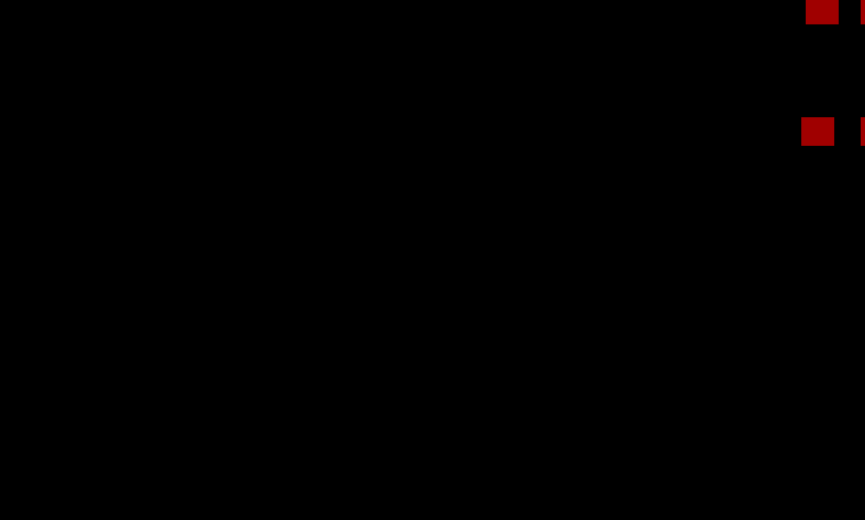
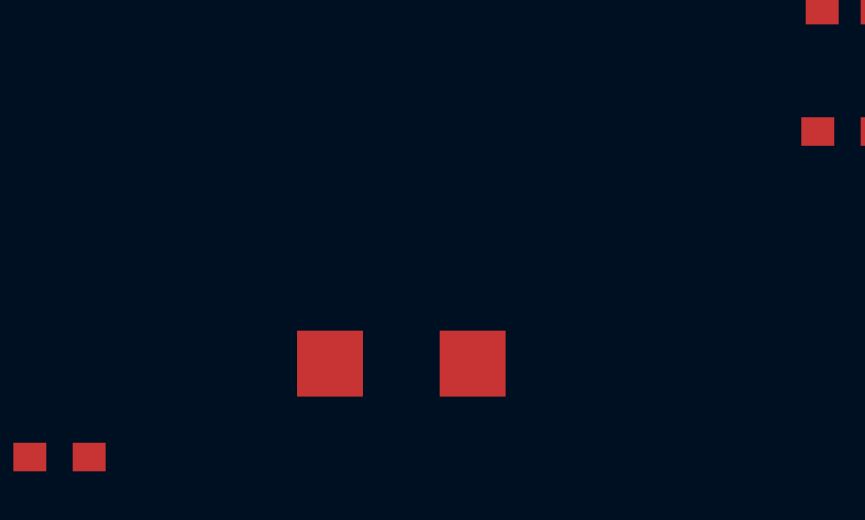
part: none -> (330, 363)
part: none -> (472, 363)
part: none -> (59, 457)

